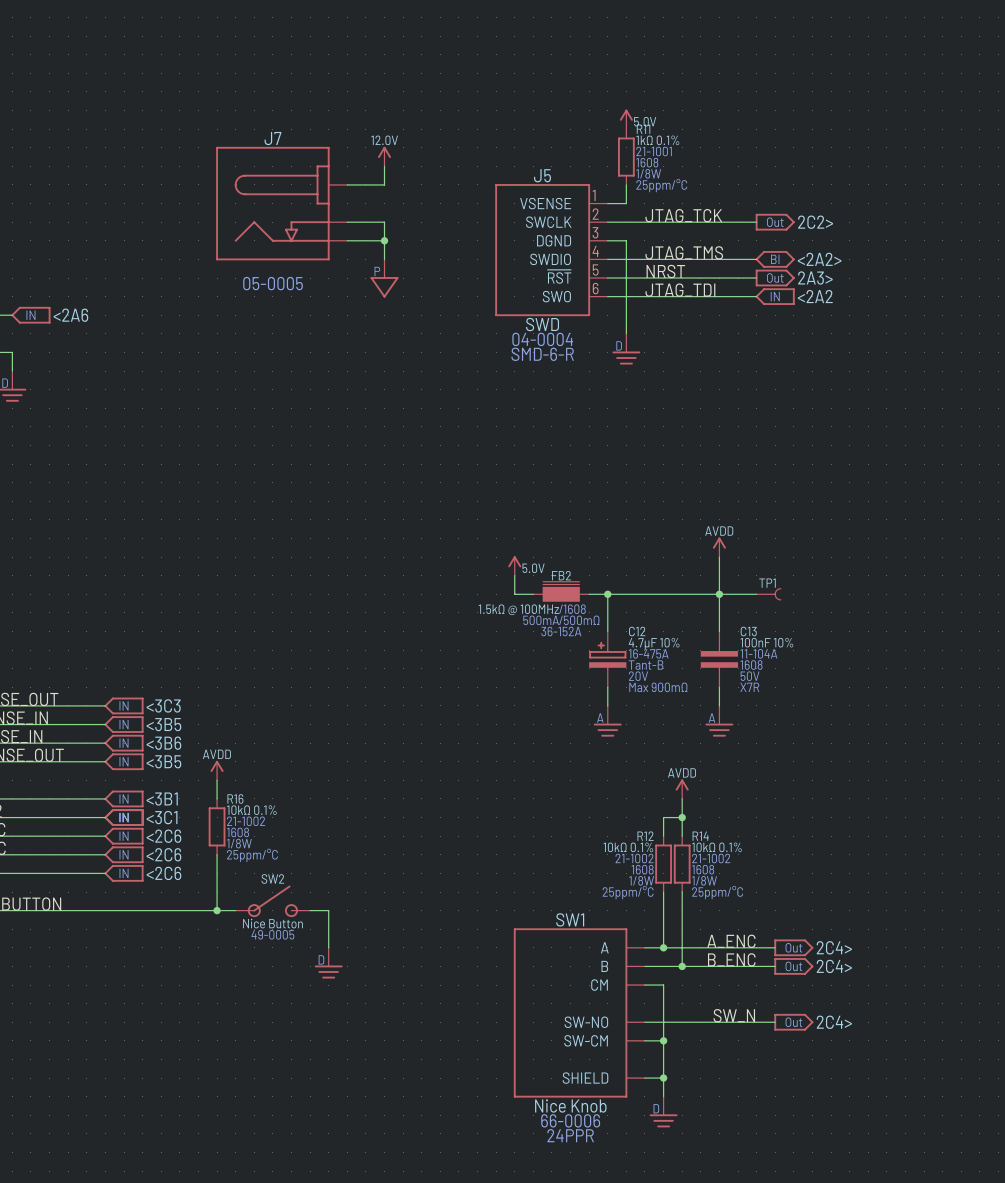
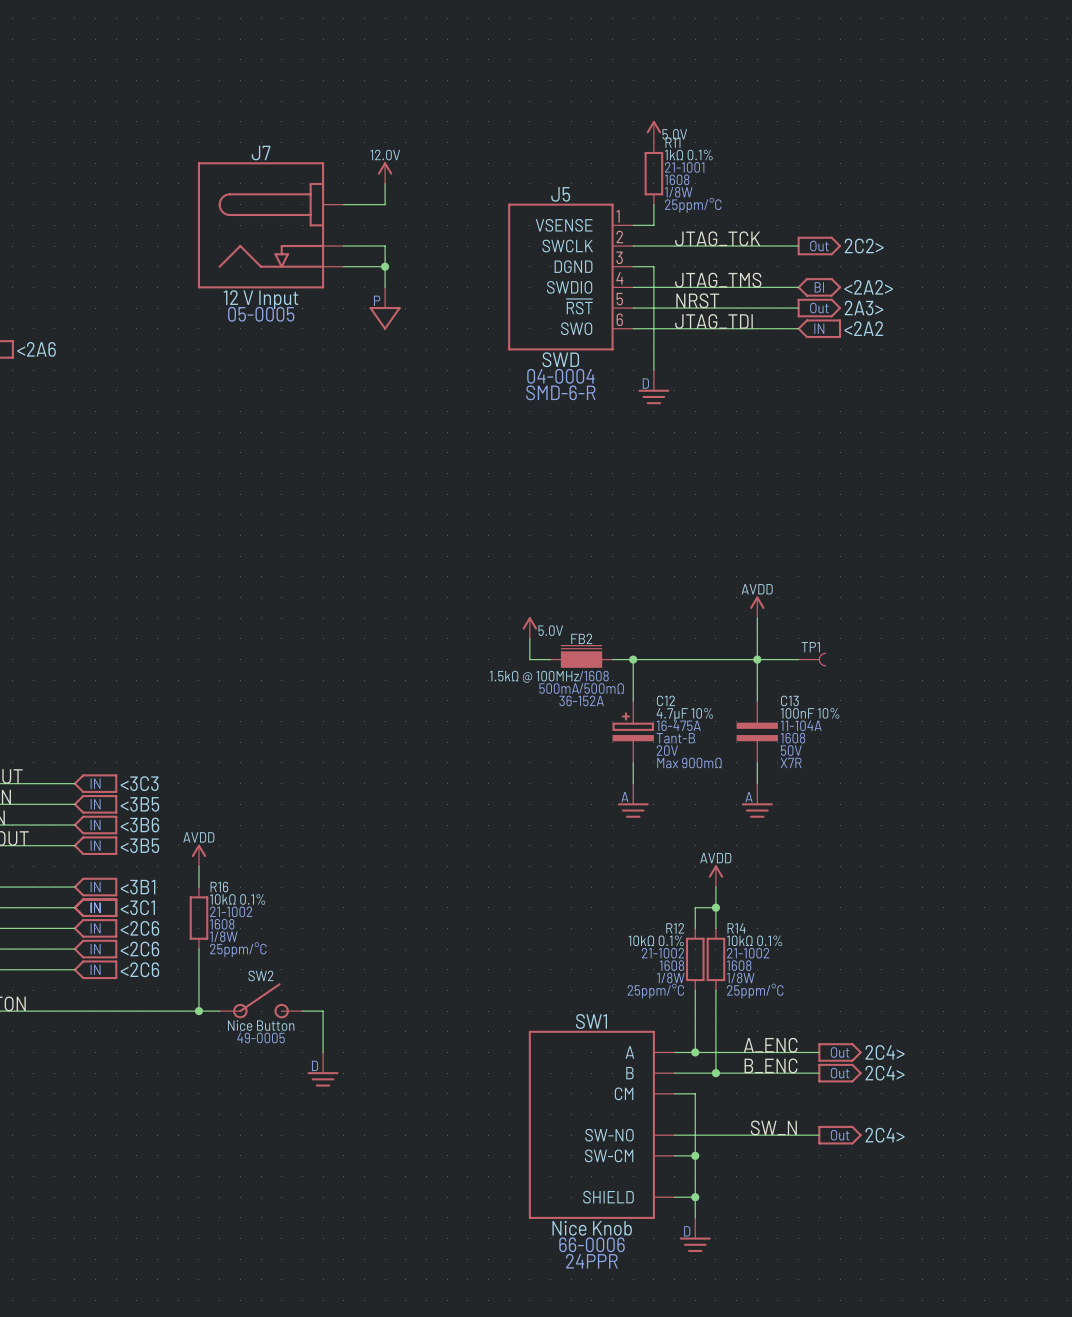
J7 value: none -> 12 V Input (261, 299)

